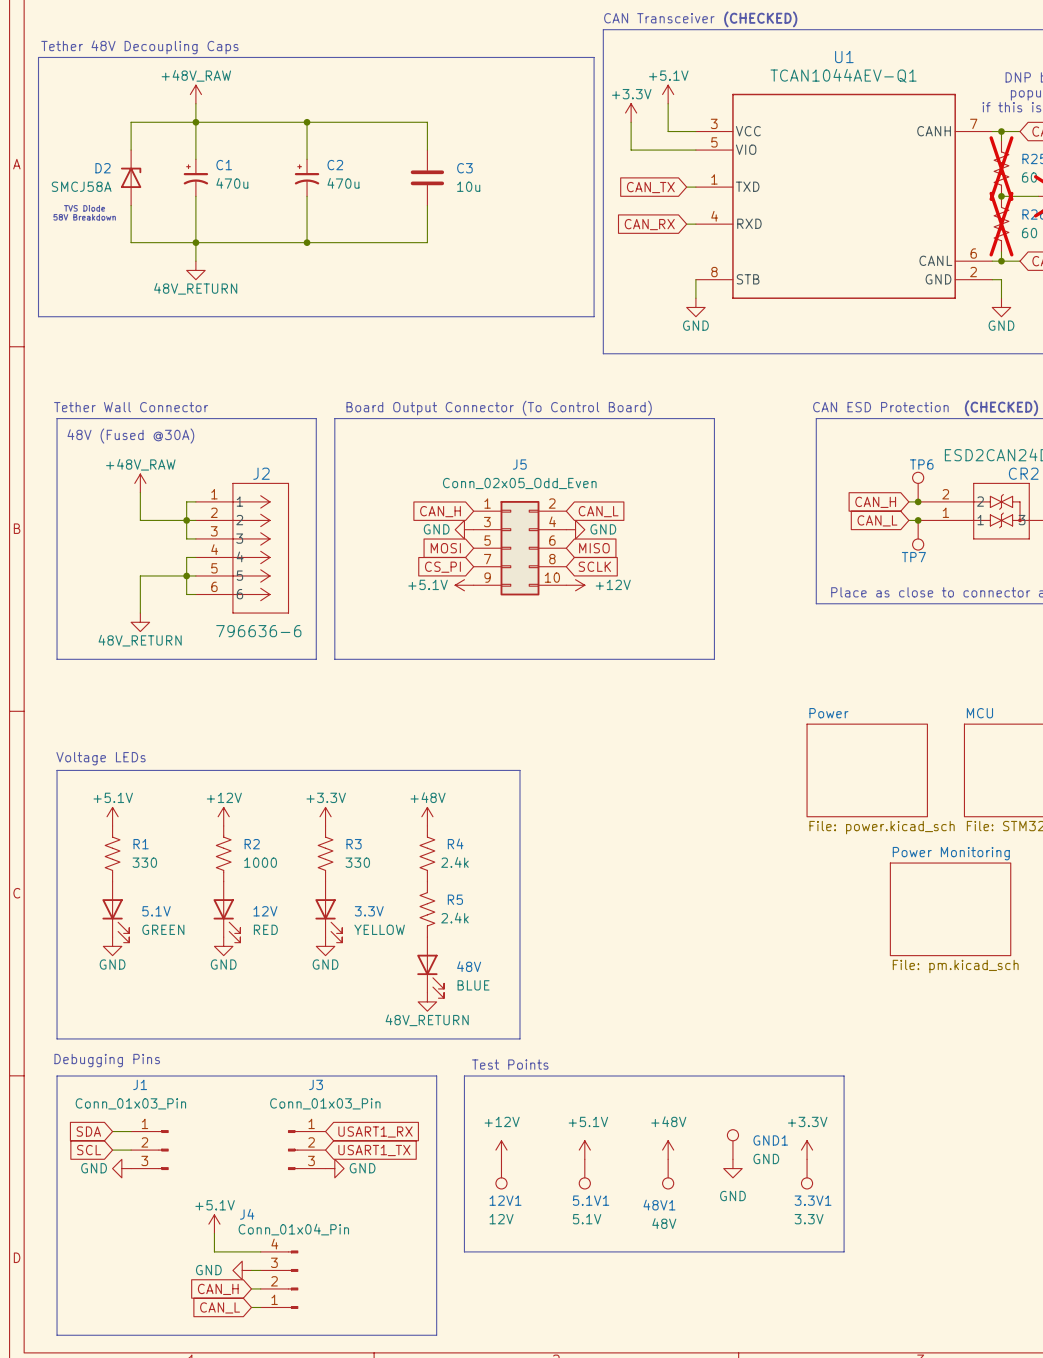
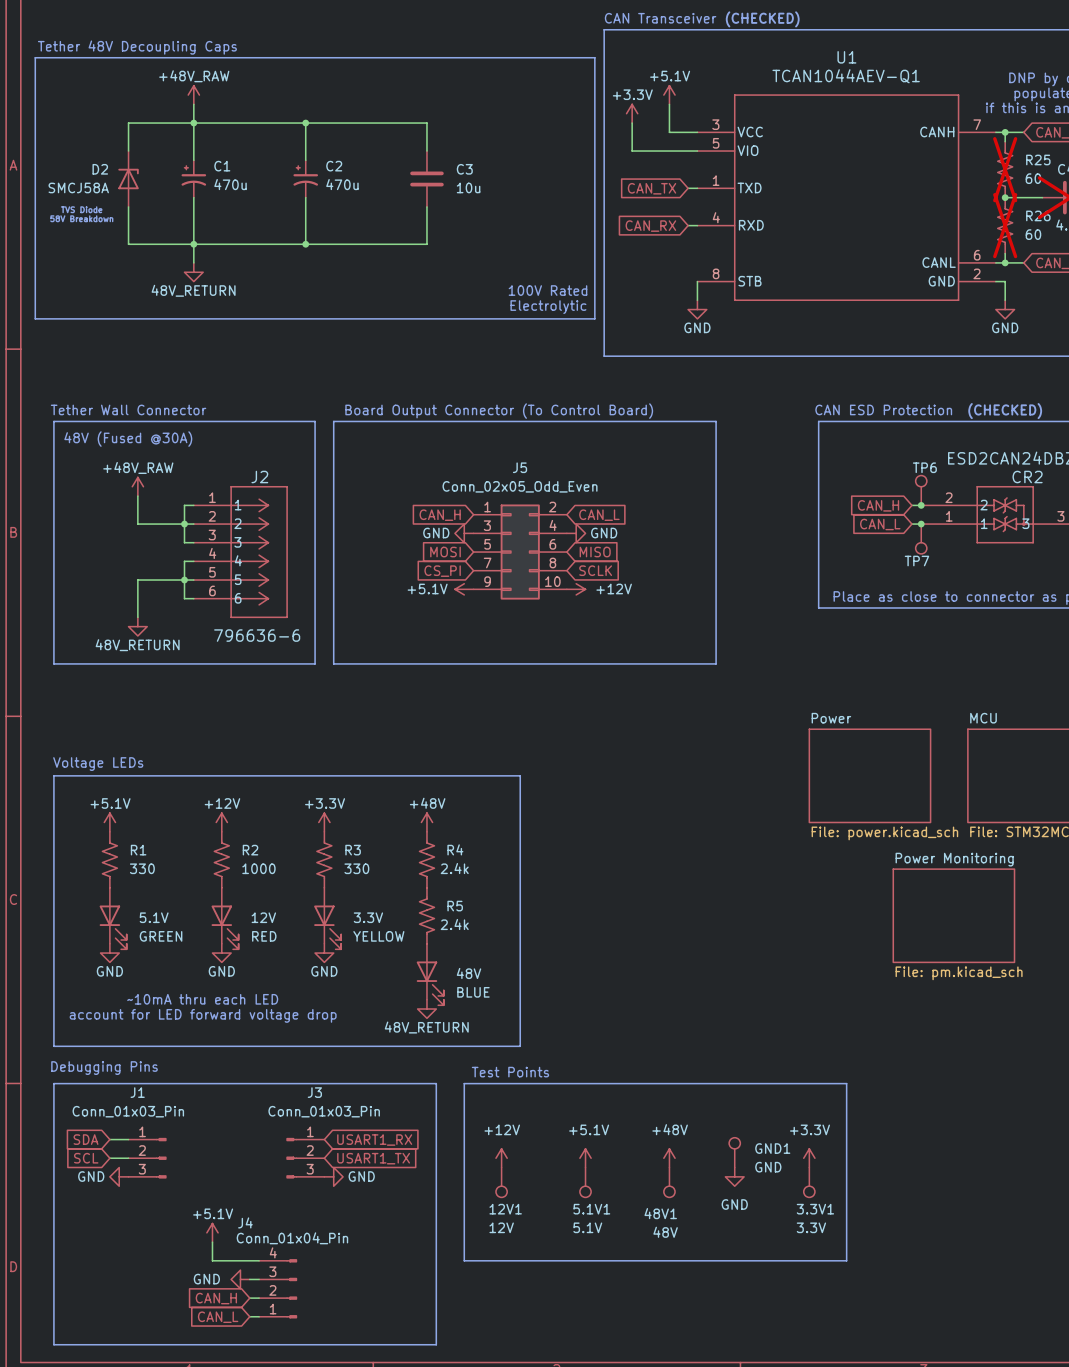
text: none -> 100V Rated (547, 290)
text: none -> Electrolytic (548, 307)
text: none -> ~10mA thru each LED (202, 999)
text: none -> account for LED forward voltage drop (203, 1015)

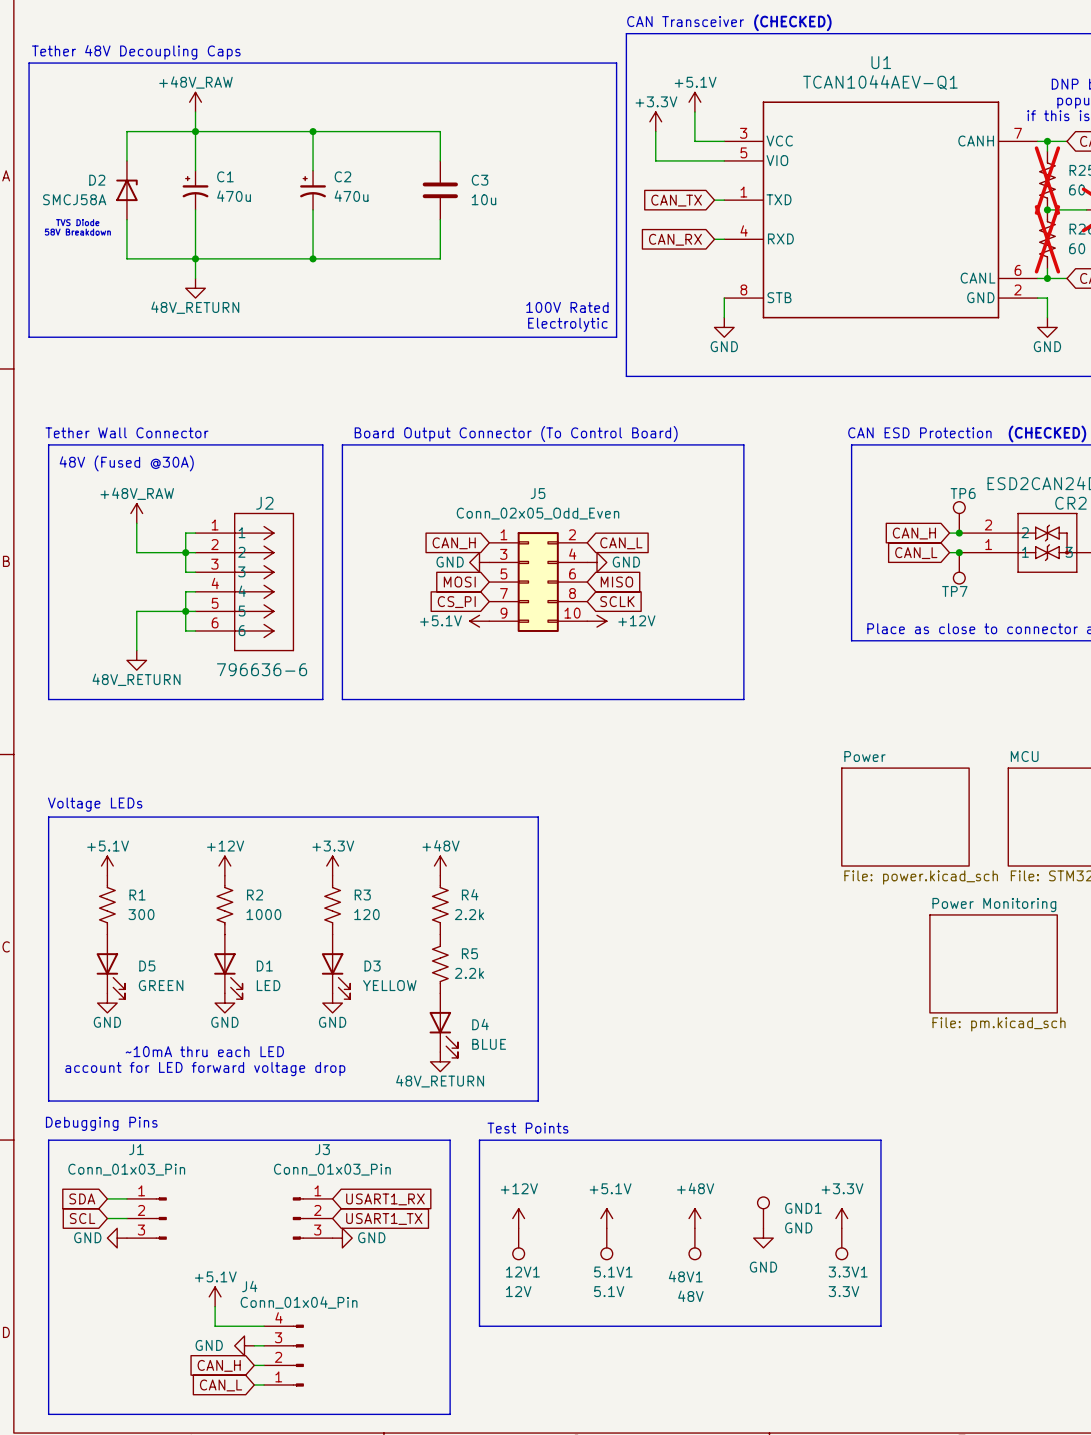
R1 value: 330 (142, 868) -> 300 (141, 914)
R3 value: 330 (356, 868) -> 120 (366, 914)
R4 value: 2.4k (454, 868) -> 2.2k (469, 914)
5.1V name: 5.1V (154, 917) -> D5 (147, 966)
12V name: 12V (263, 917) -> D1 (264, 966)
3.3V name: 3.3V (368, 917) -> D3 (372, 966)
R5 value: 2.4k (454, 924) -> 2.2k (469, 973)
12V value: RED (264, 936) -> LED (268, 985)
48V name: 48V (469, 973) -> D4 (480, 1024)

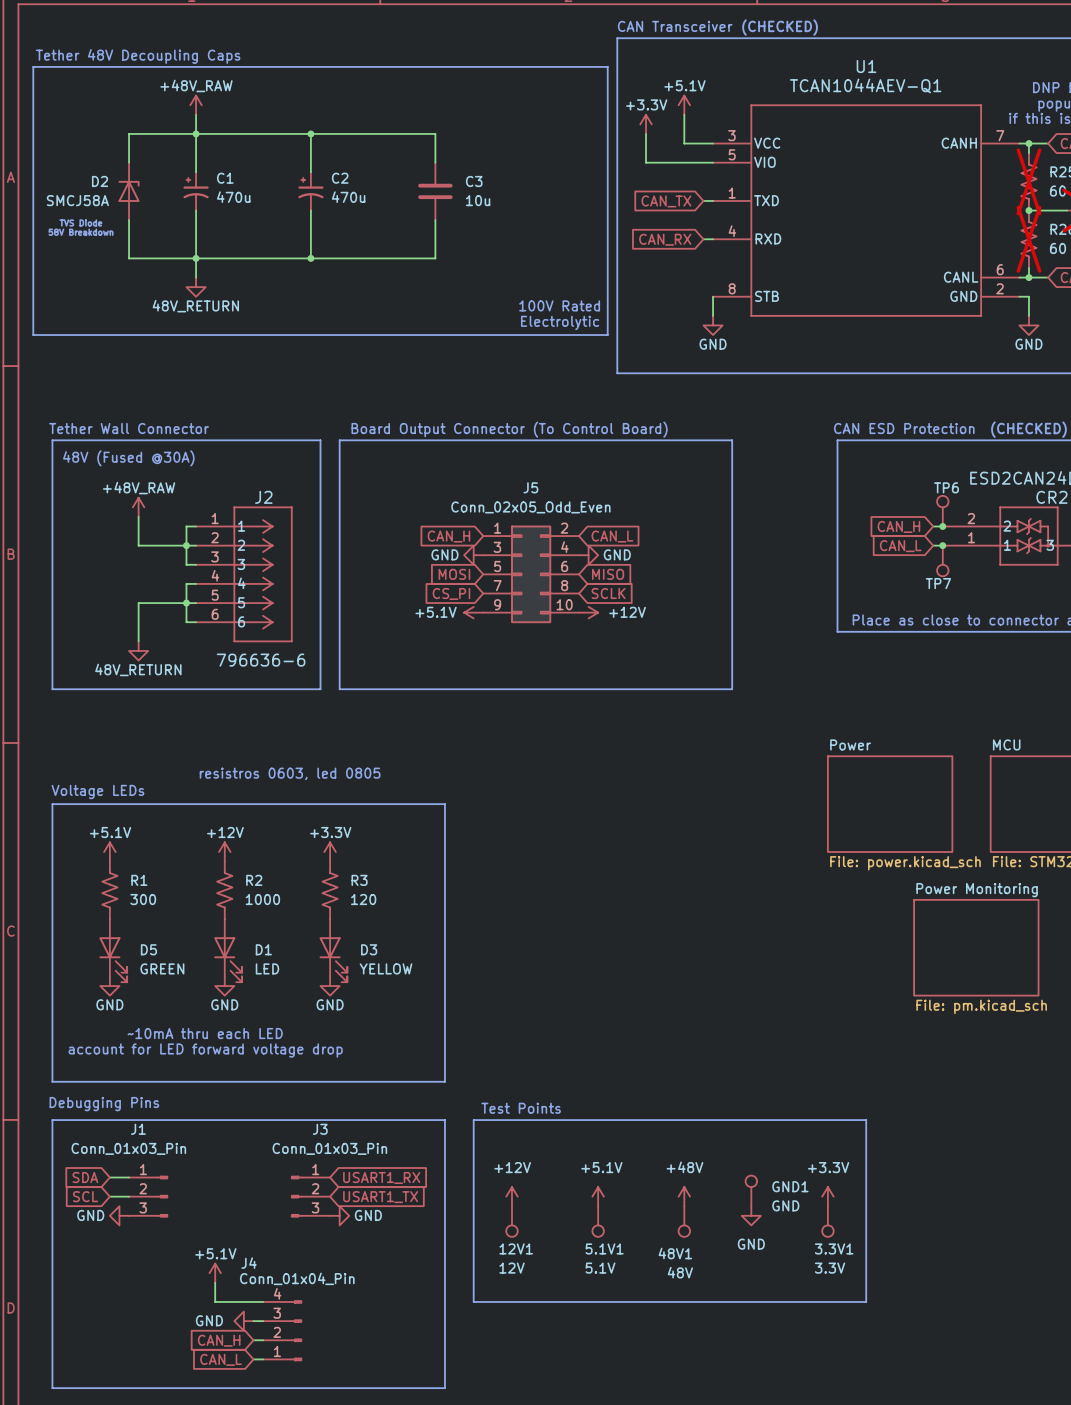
text: none -> resistros 0603, led 0805 (290, 773)
line: (450, 817) (538, 817) (538, 1101) (450, 1101) -> (444, 804) (444, 1081)
power symbol: +48V (440, 866) -> none
R4: 2.2k (440, 905) -> none
R5: 2.2k (440, 963) -> none
D4: BLUE (443, 1025) -> none
power symbol: 48V_RETURN (440, 1061) -> none

